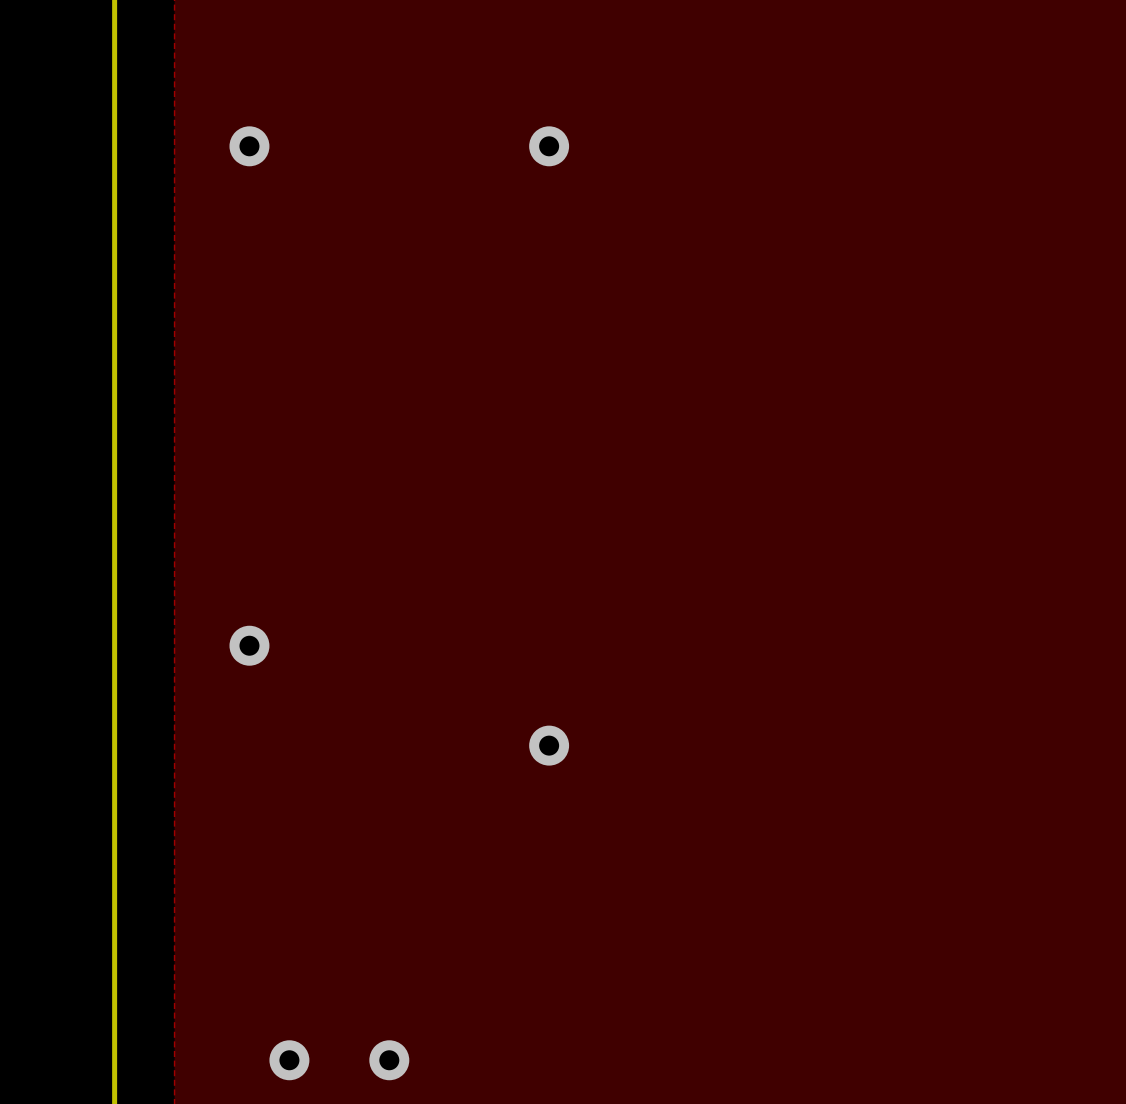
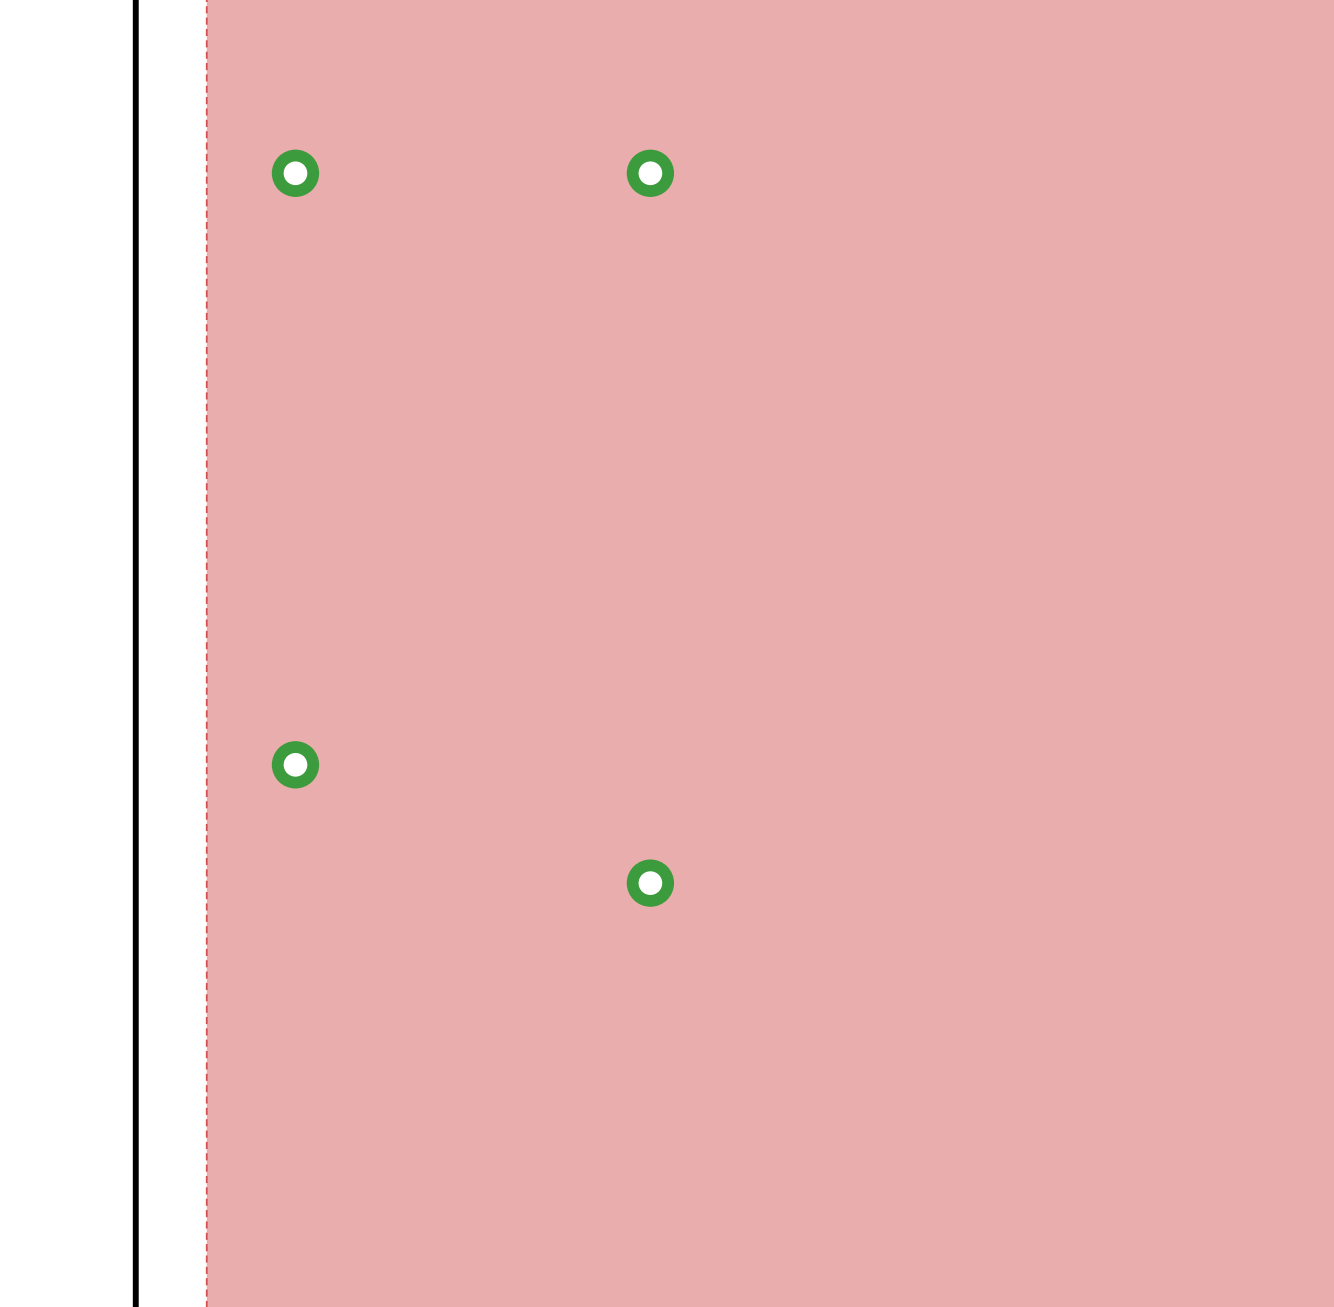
via: (289, 1060) -> none
via: (389, 1060) -> none

